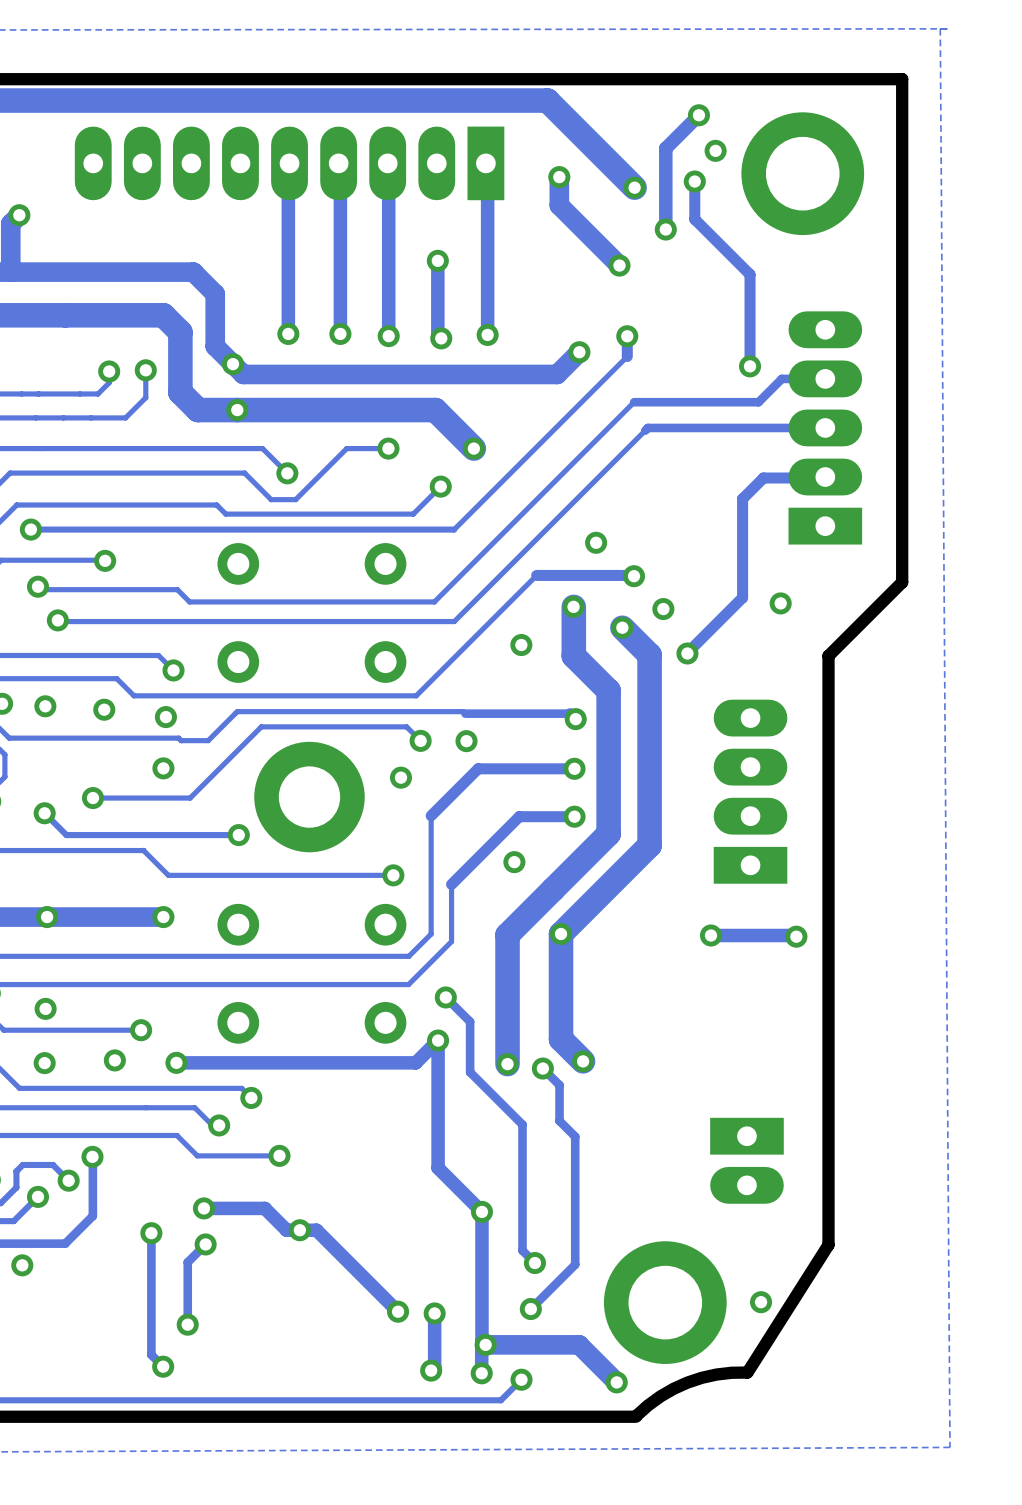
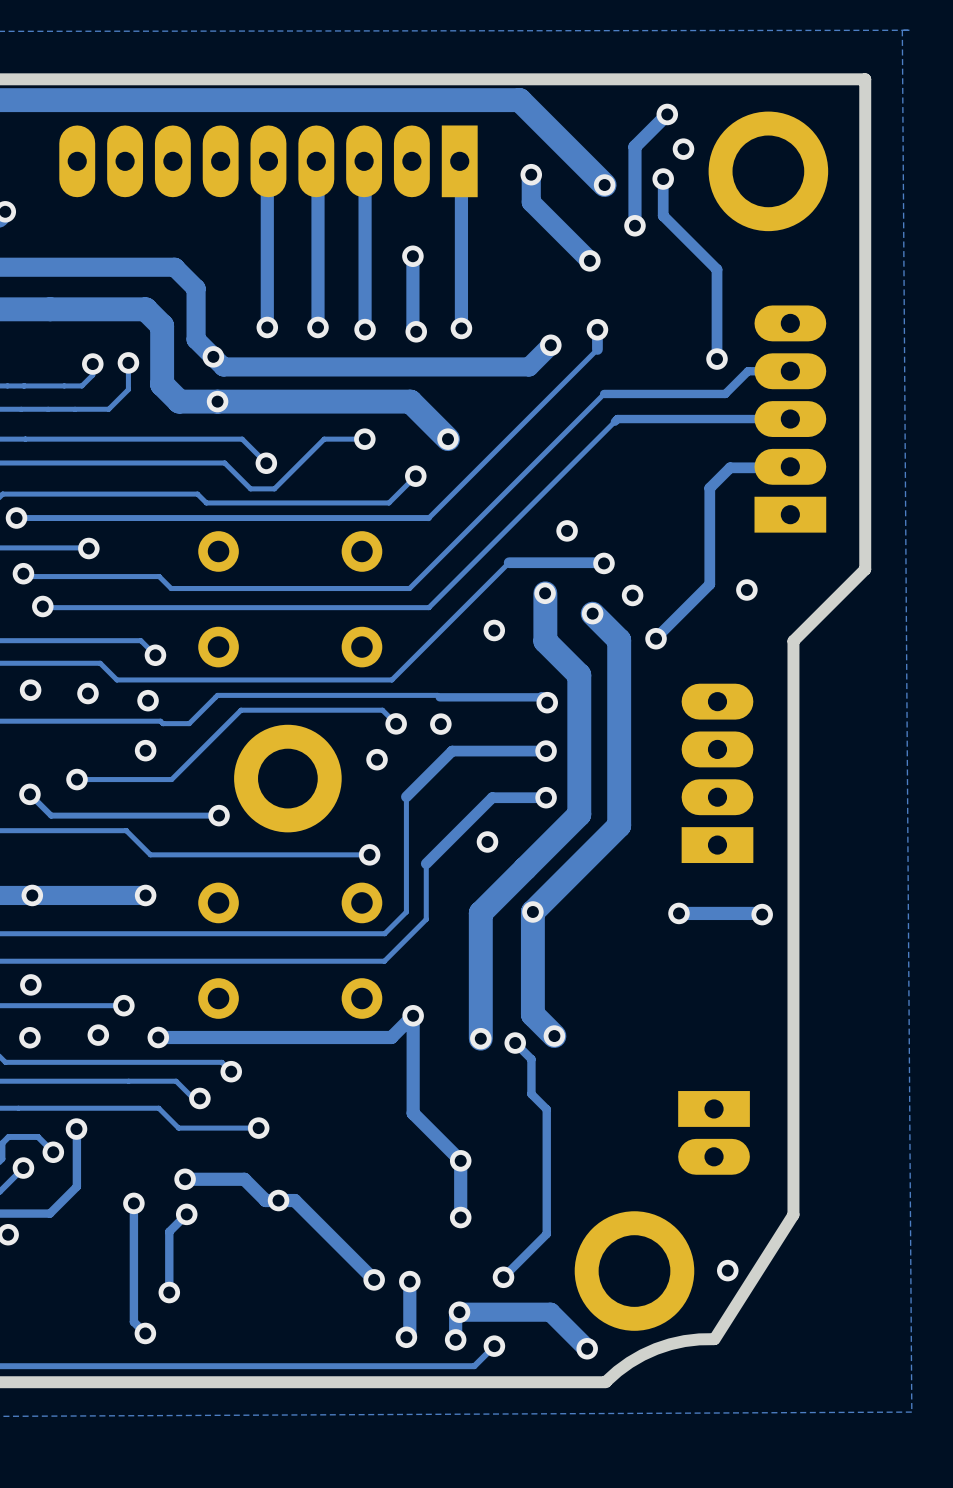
track: (445, 997) (470, 1021) (470, 1072) (522, 1124) (522, 1250) (534, 1263) -> none
via: (445, 997) -> none
track: (438, 1140) (438, 1168) (481, 1211) (481, 1341) (485, 1344) -> (413, 1113) (460, 1160) (460, 1217)
via: none -> (460, 1160)
via: (481, 1211) -> none
via: none -> (460, 1217)
via: (534, 1263) -> none

